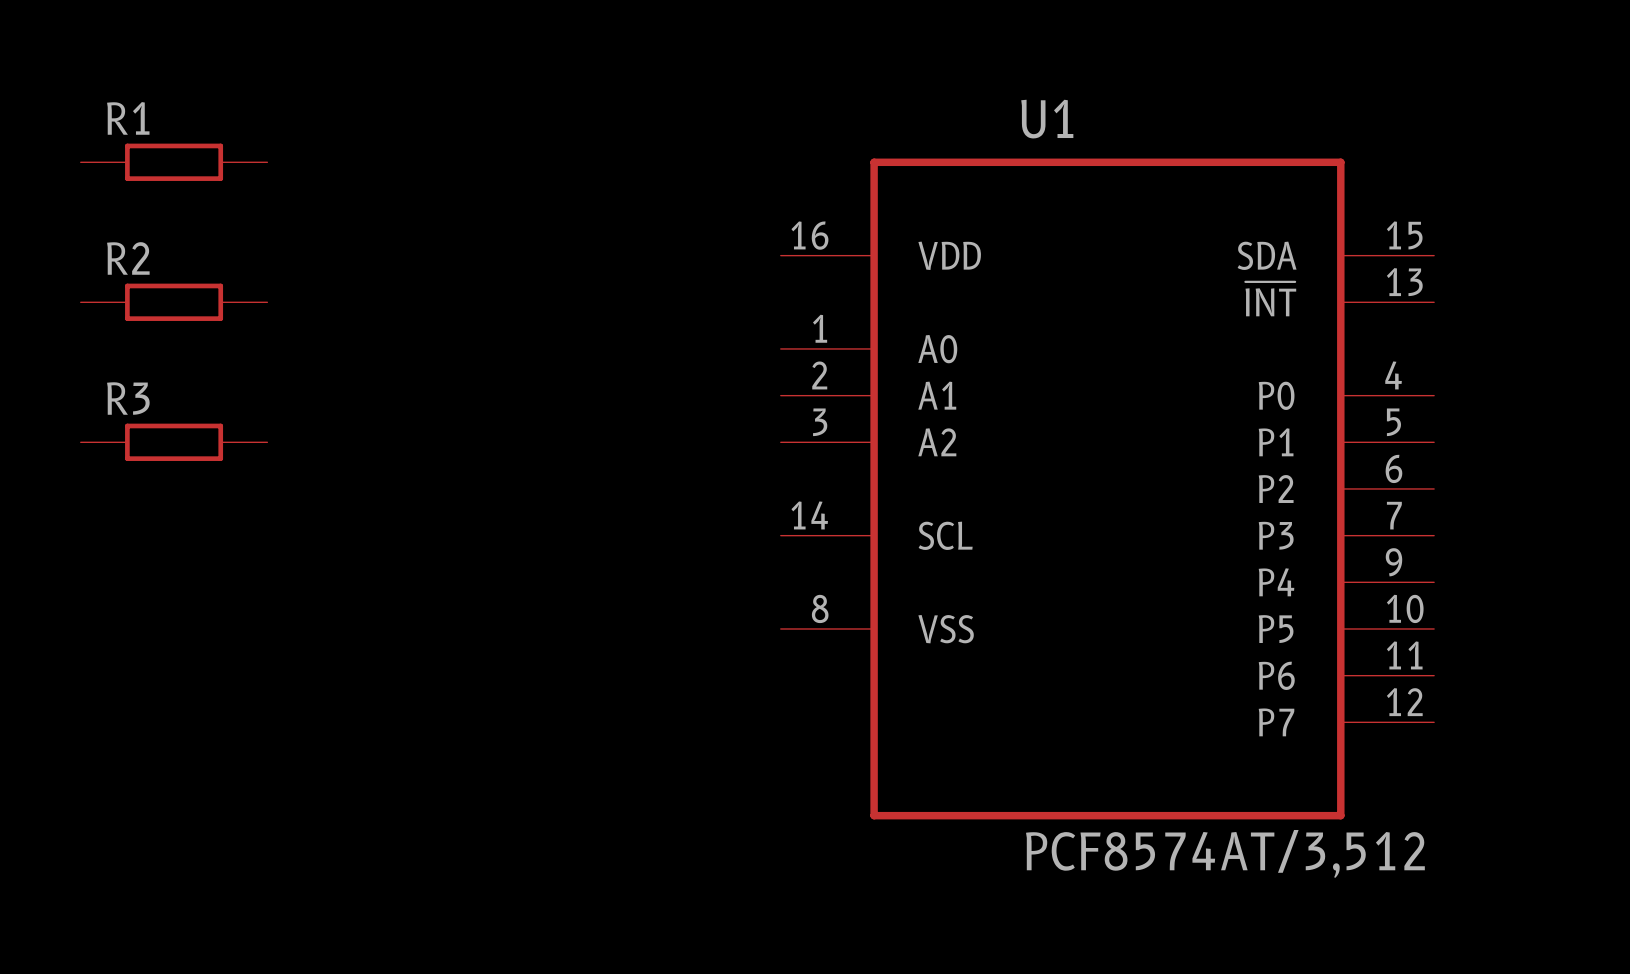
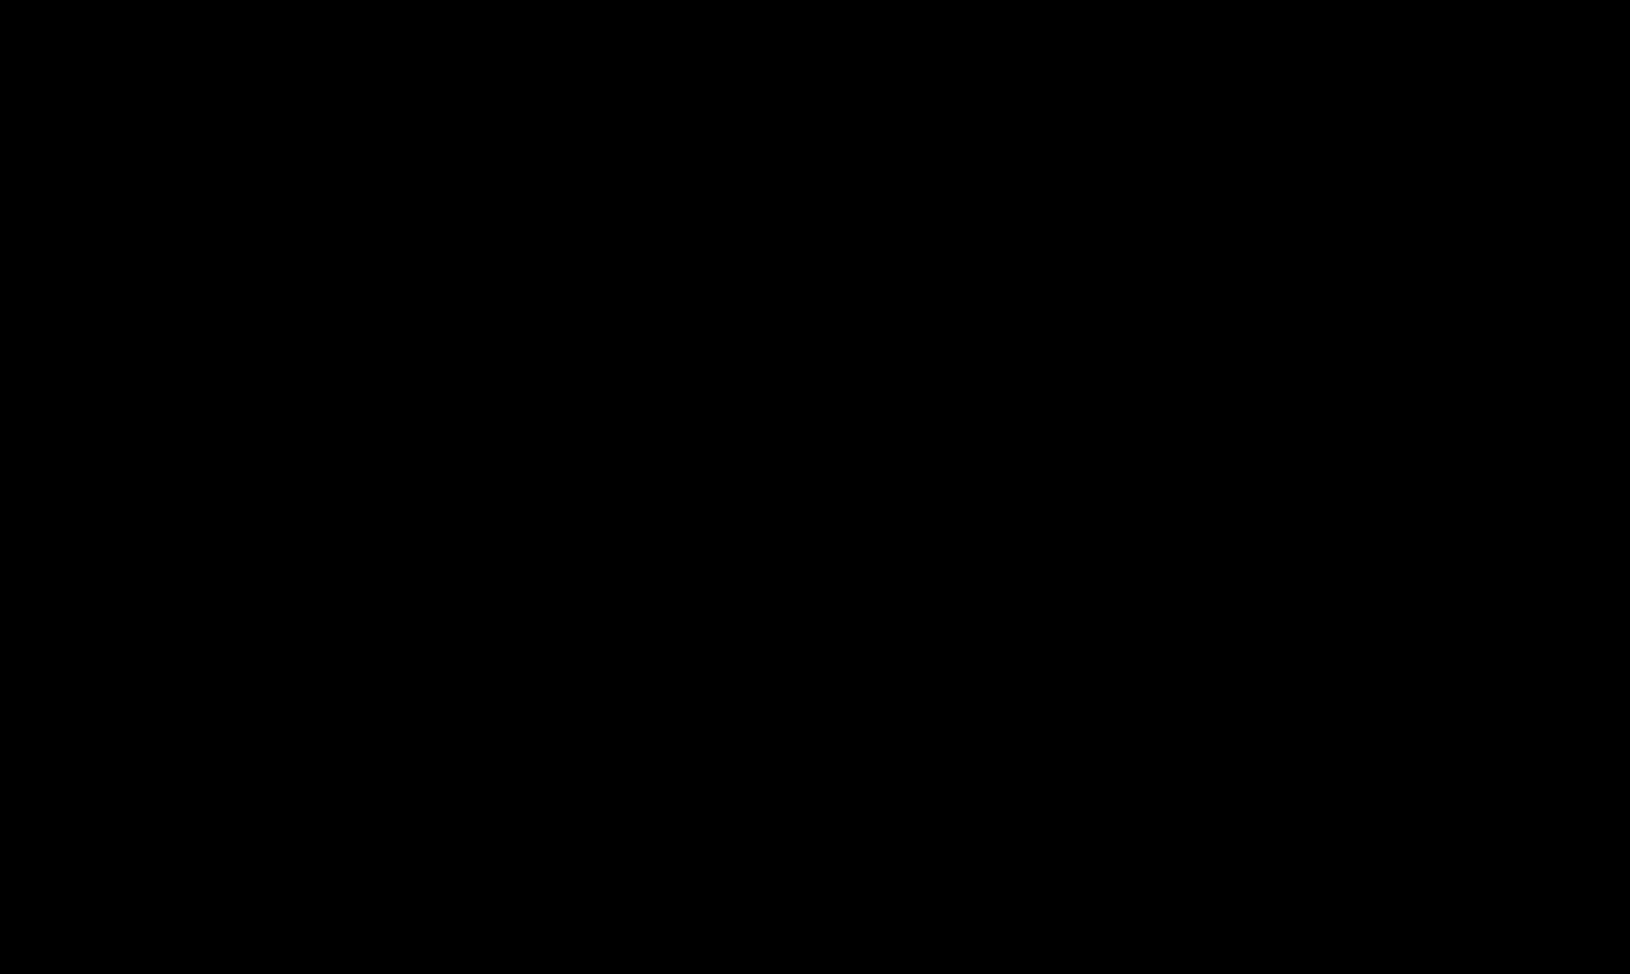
R1: (174, 162) -> none
R2: (174, 302) -> none
R3: (174, 442) -> none
U1: PCF8574AT/3,512 (1107, 488) -> none

